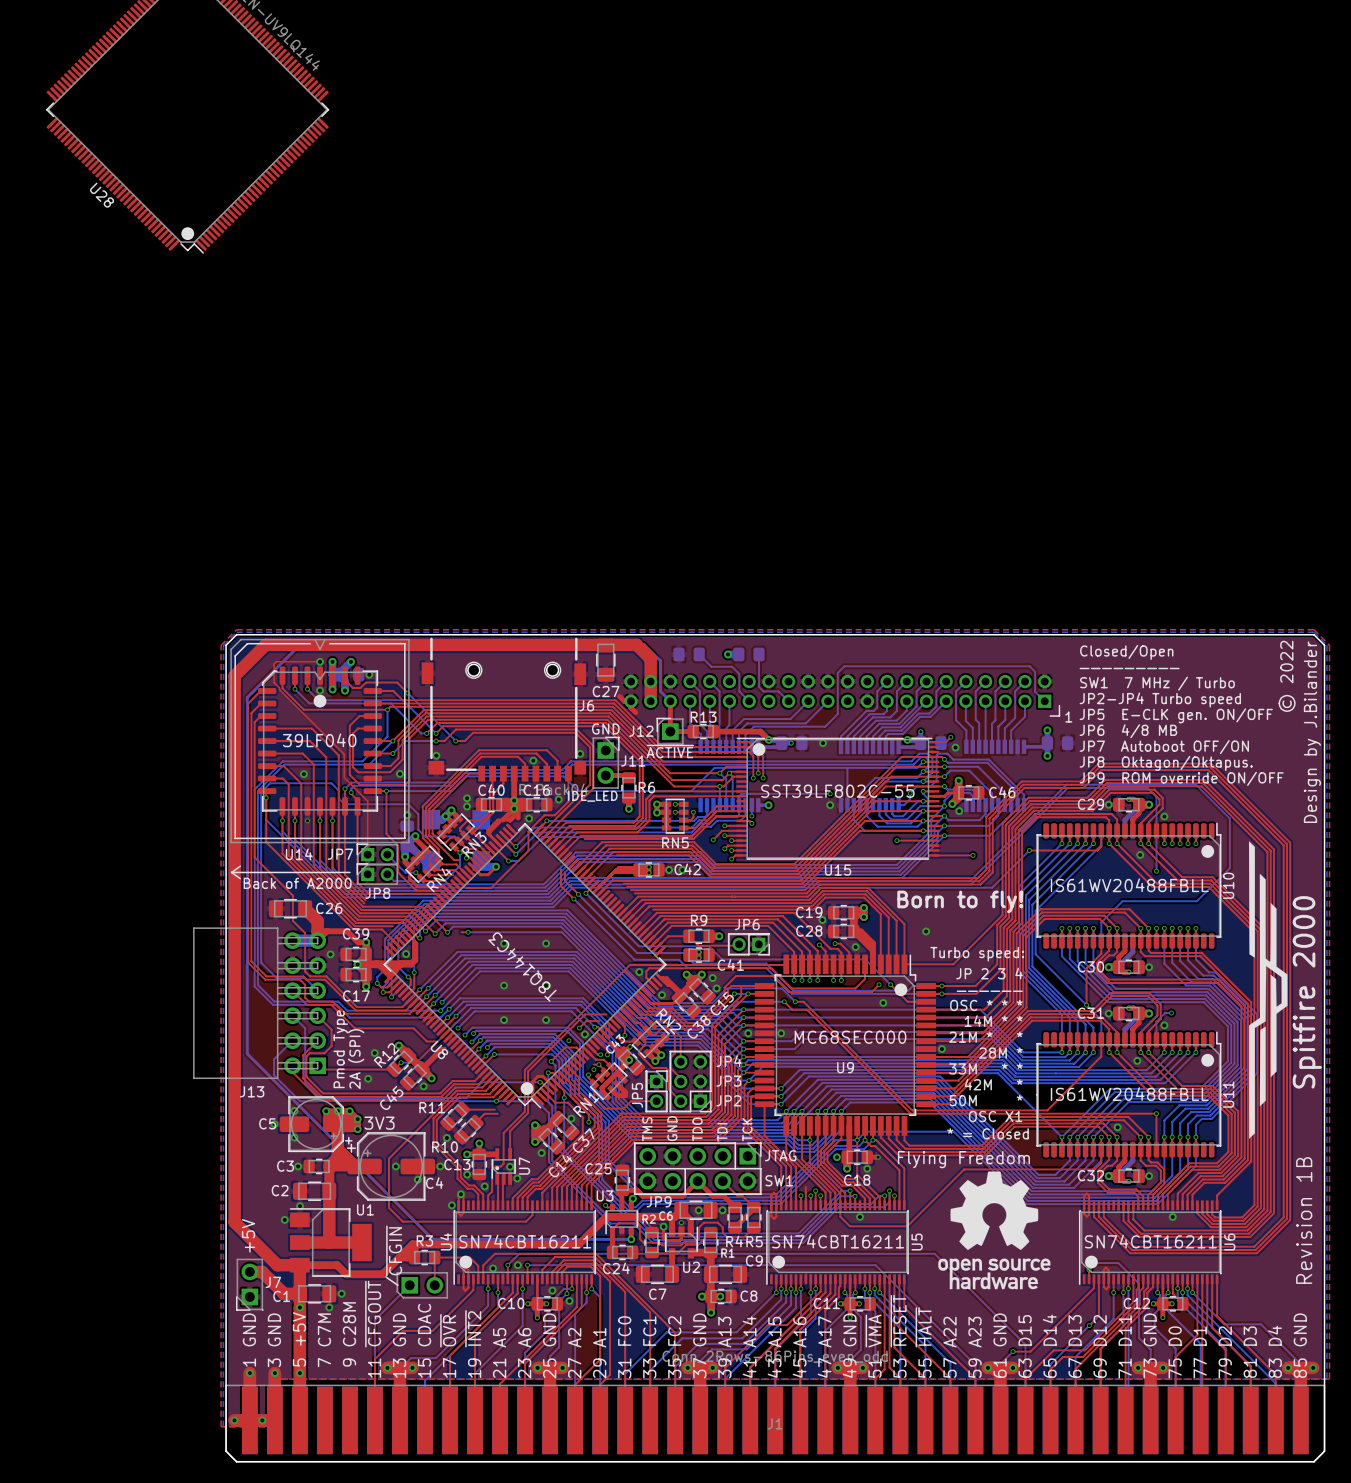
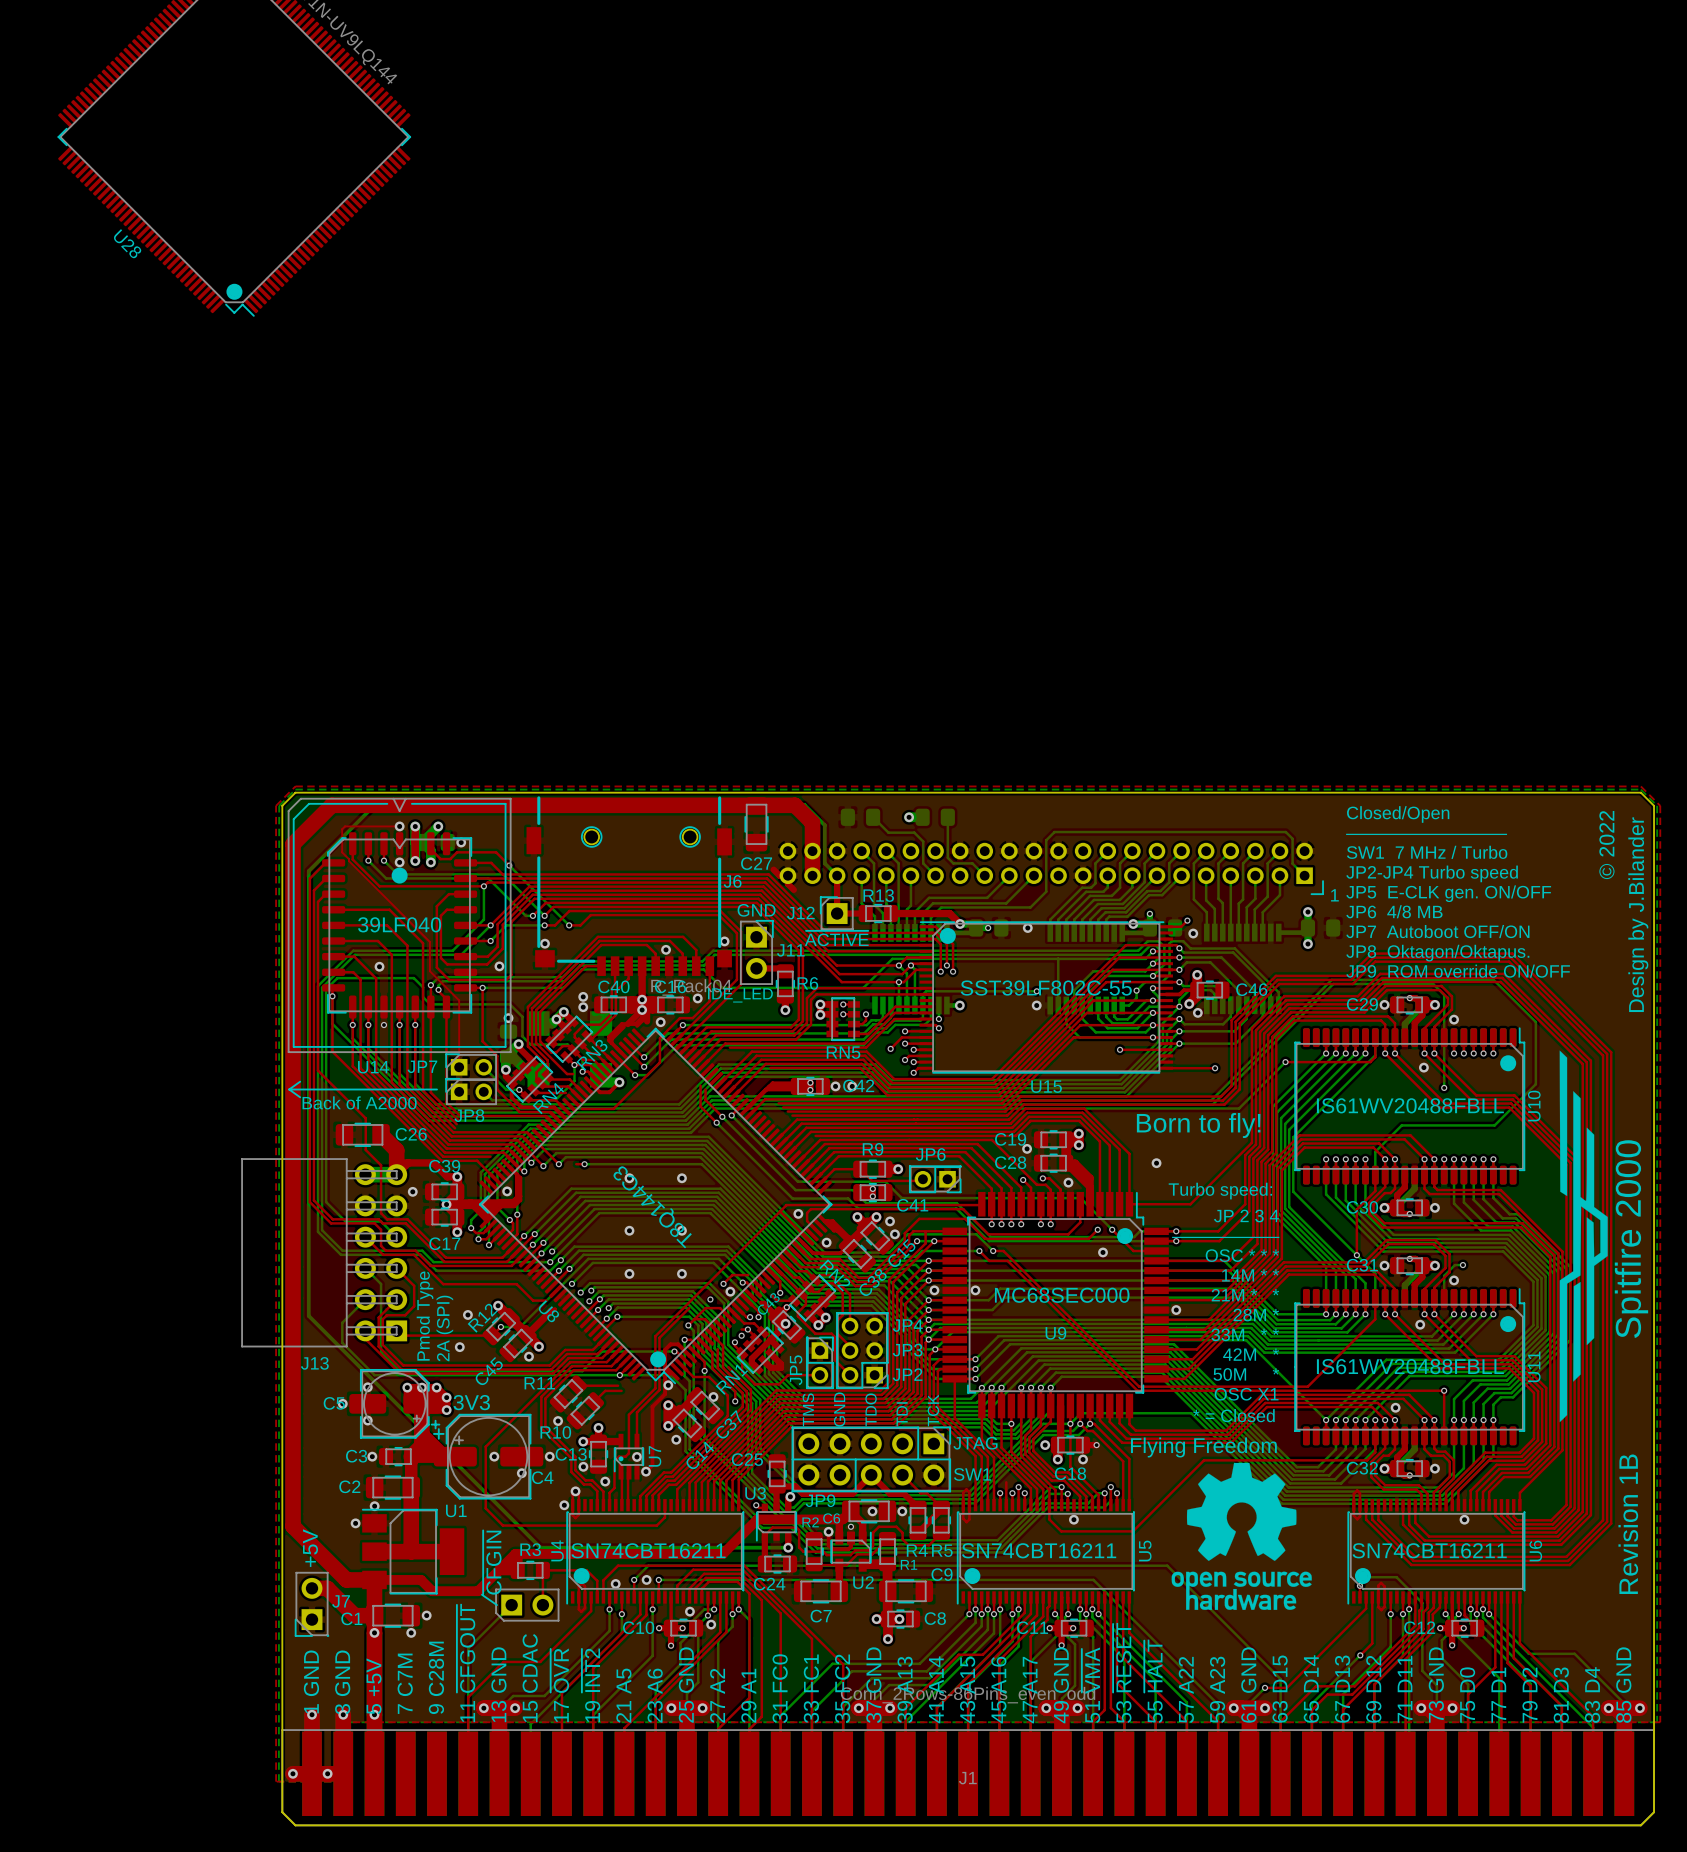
top track: (606, 1014) (585, 1014) (551, 1047) -> none
top track: none -> (694, 1319) (705, 1319) (715, 1329)
top track: (537, 1076) (532, 1081) (532, 1100) -> (671, 1344) (665, 1349) (665, 1394) (652, 1406) (652, 1465) (646, 1471)
via: none -> (668, 1385)

